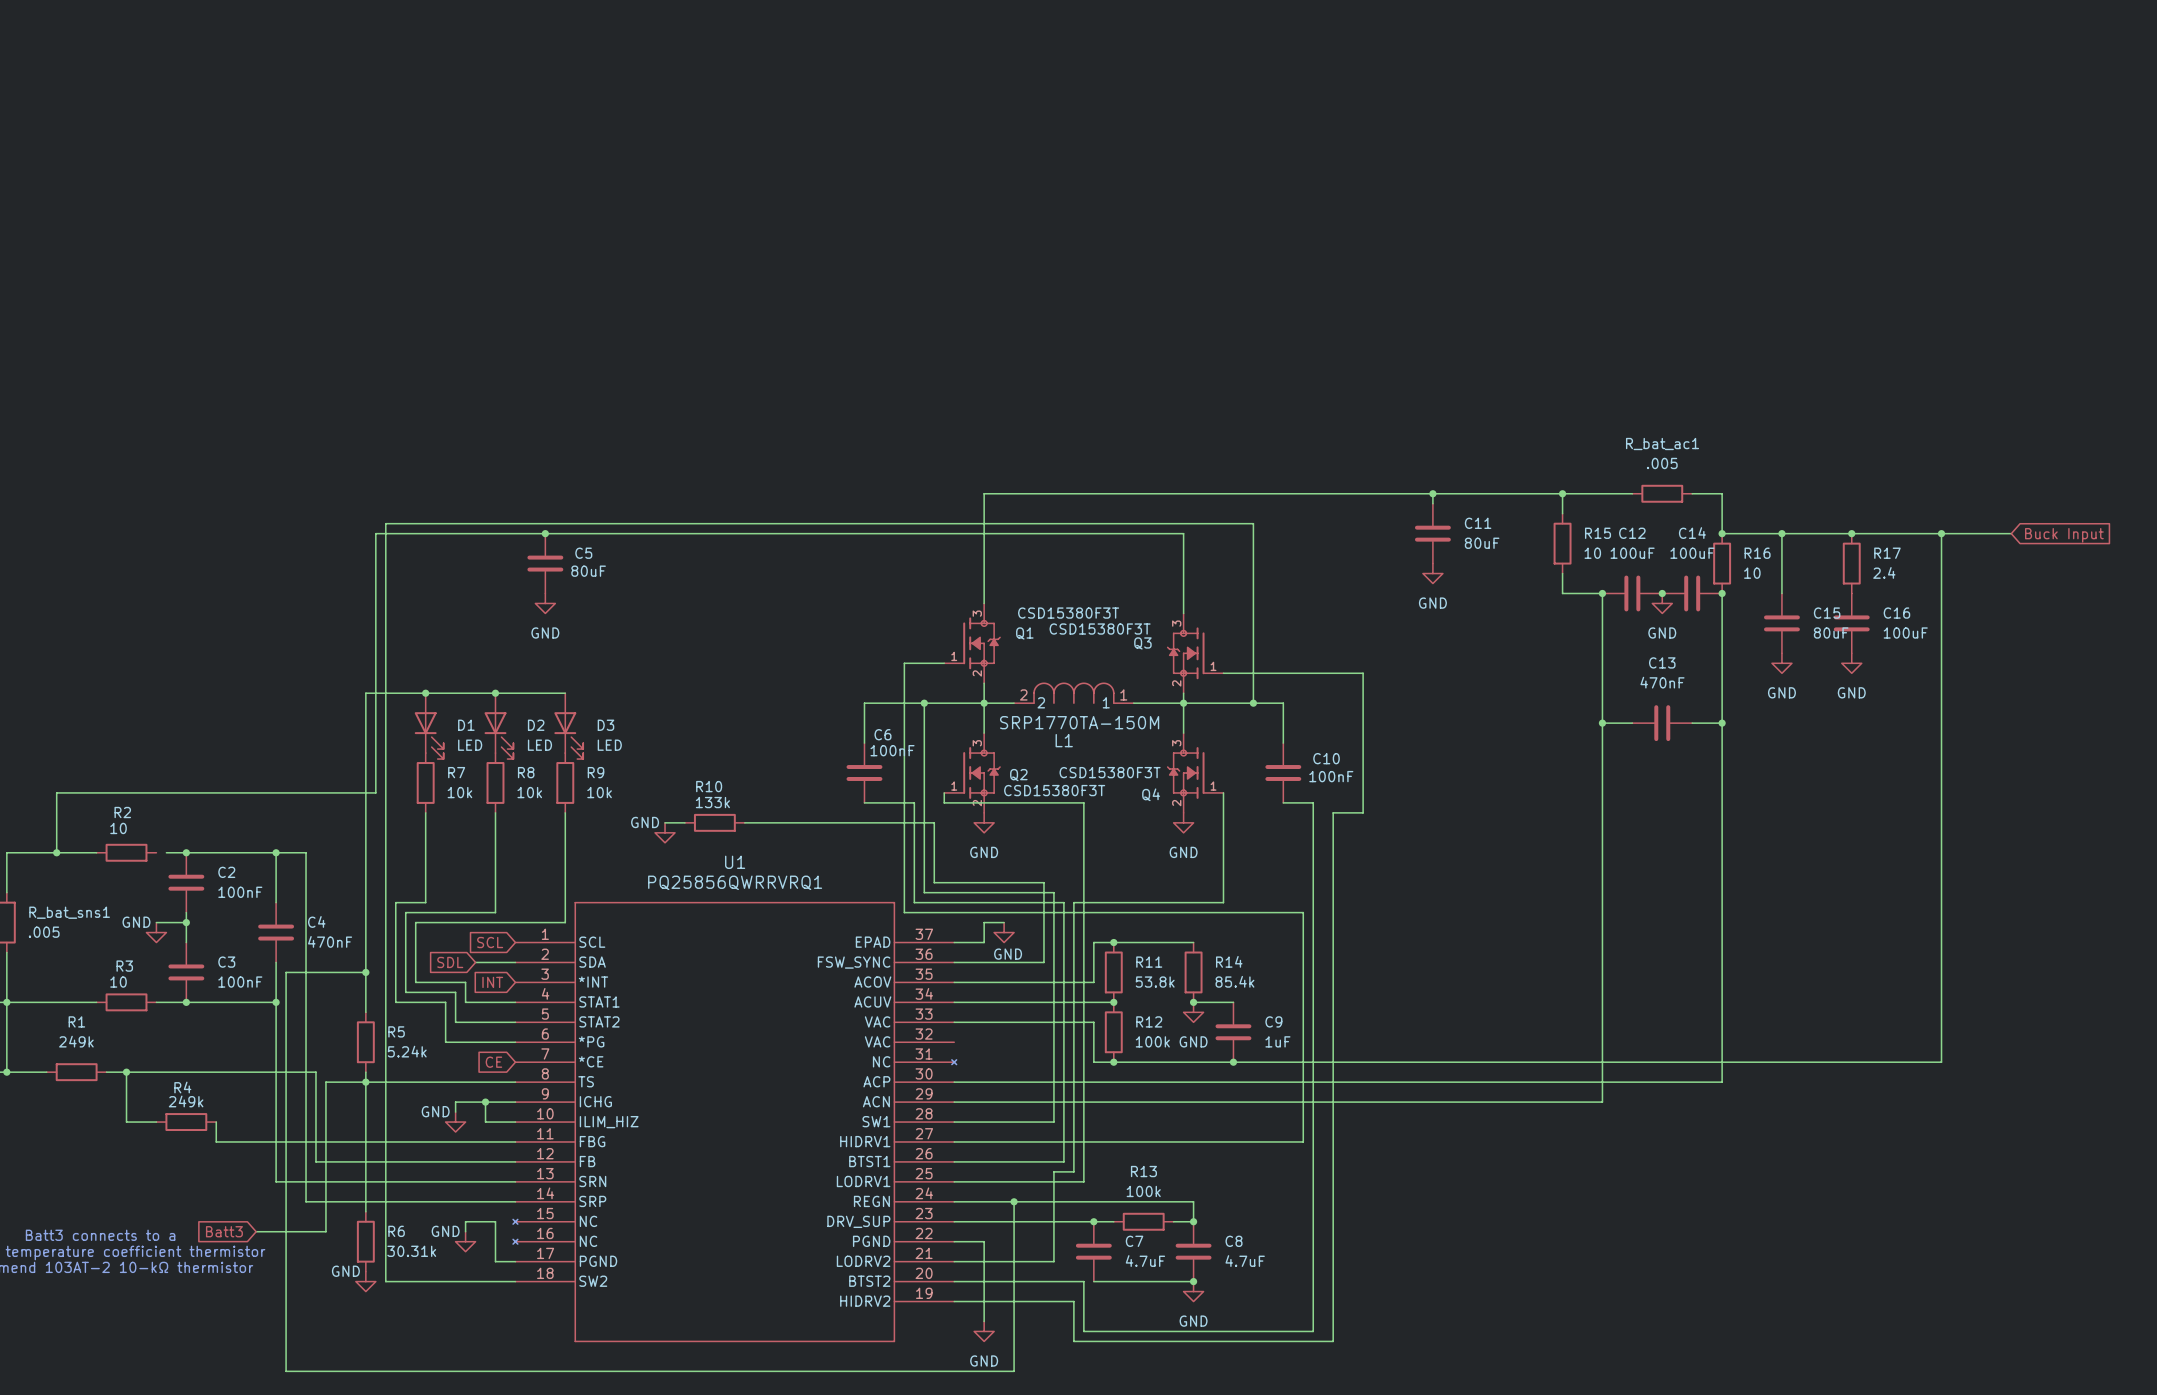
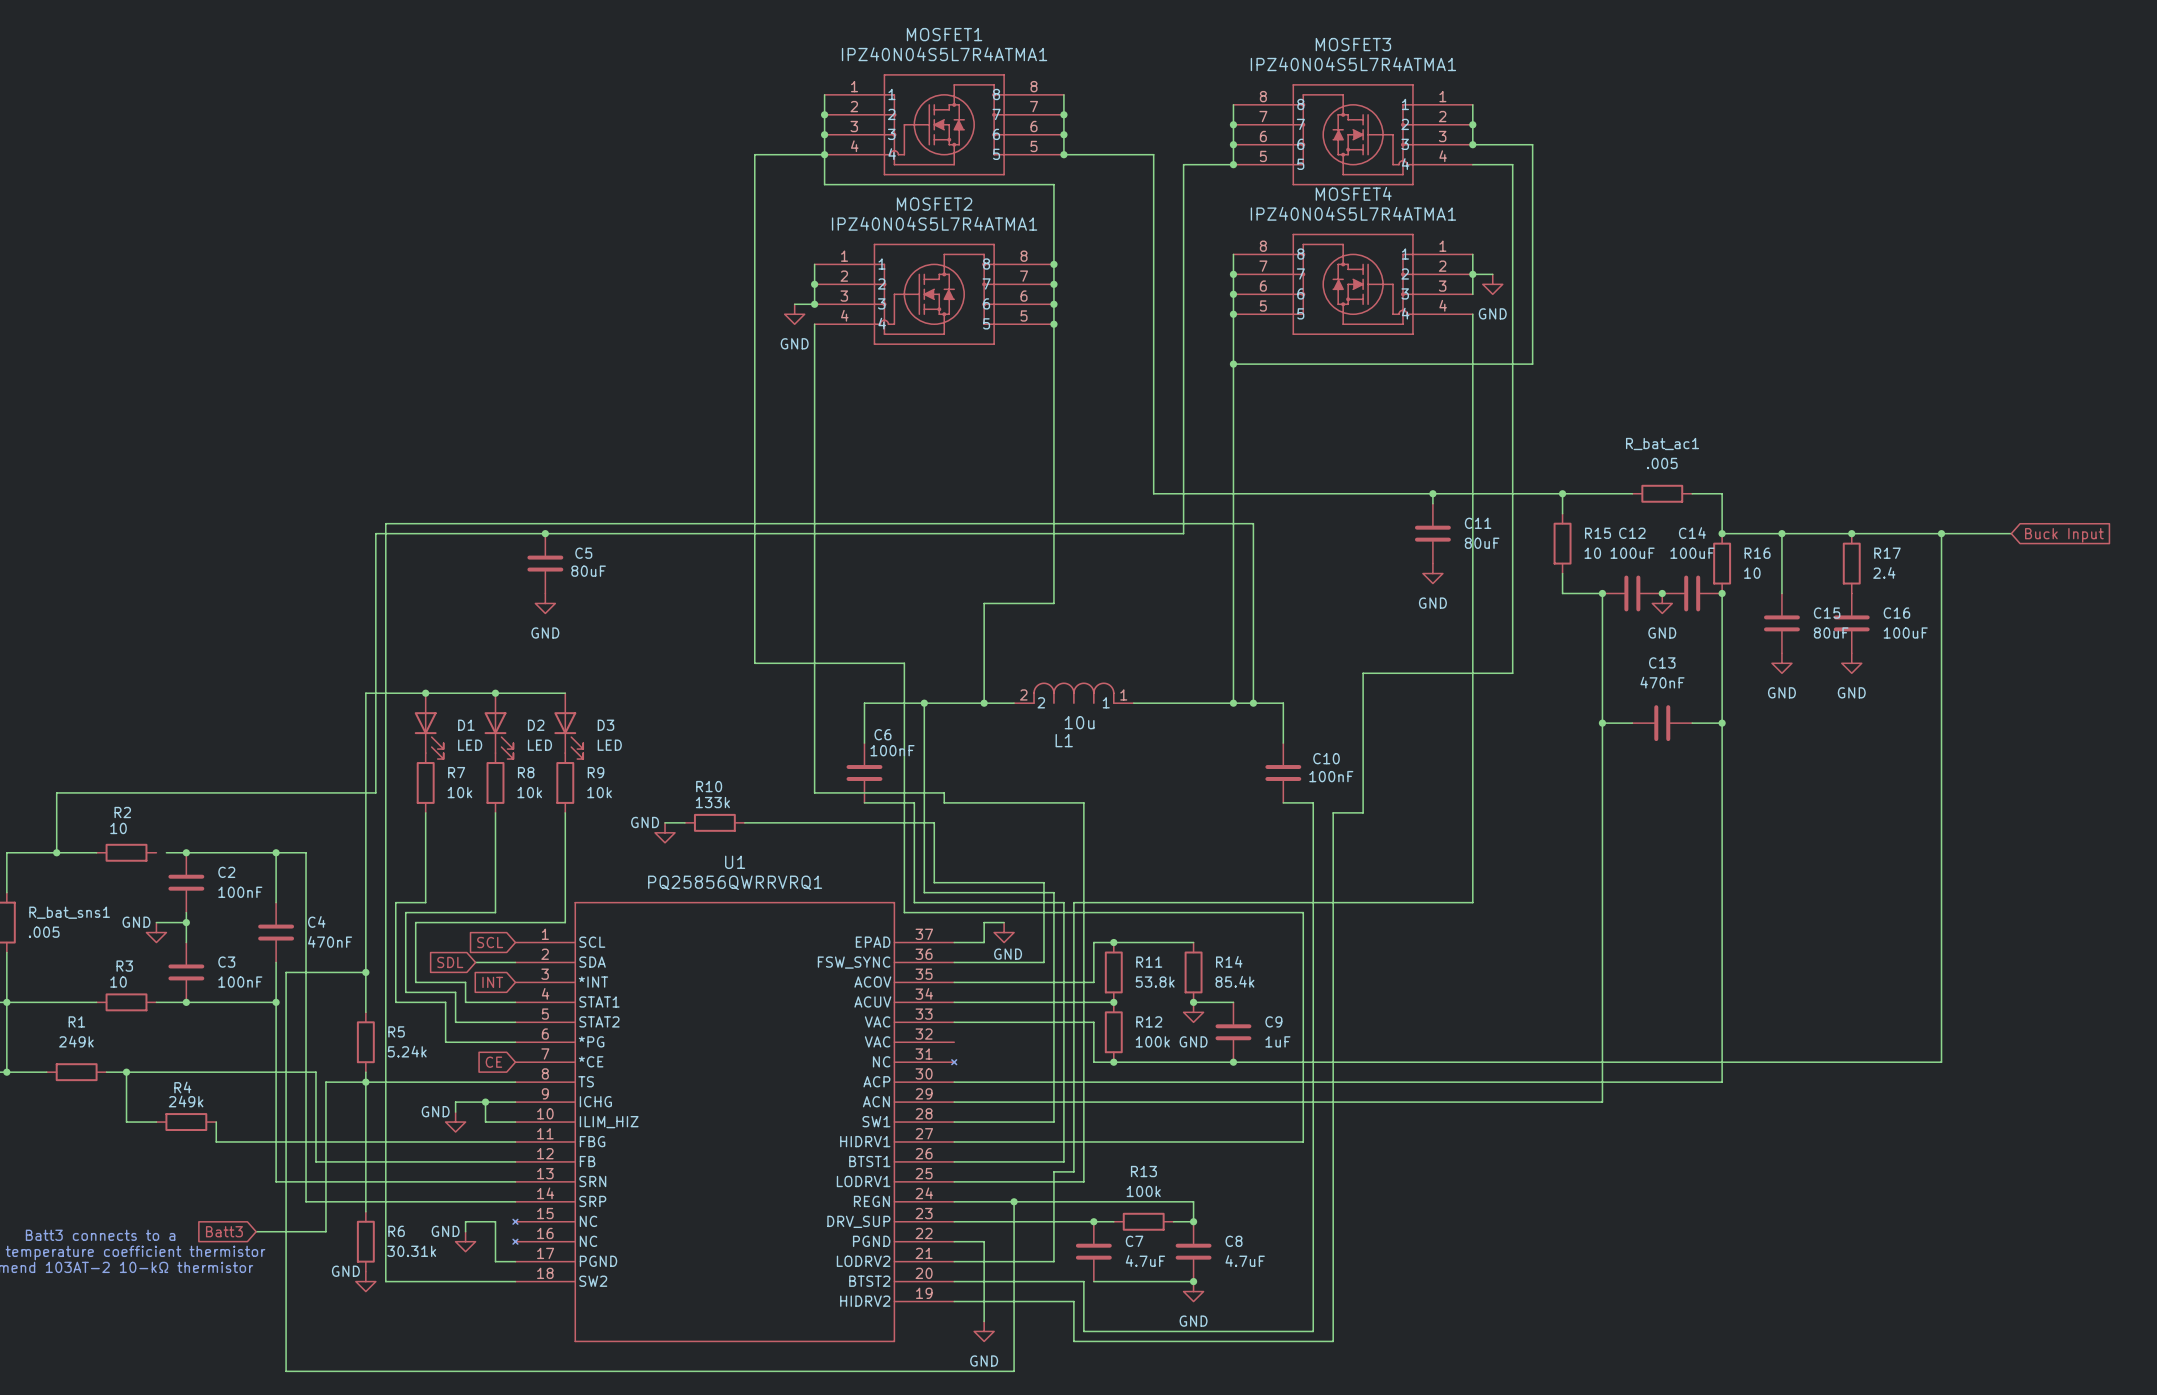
wire: none -> (824, 94) (824, 184) (1053, 184) (1053, 603) (984, 603) (984, 683)
wire: none -> (1472, 104) (1472, 144) (1532, 144) (1532, 364) (1233, 364)
junction: none -> (824, 114)
junction: none -> (1063, 114)
MOSFET1: none -> IPZ40N04S5L7R4ATMA1 (944, 124)
junction: none -> (1233, 124)
junction: none -> (1472, 124)
junction: none -> (824, 134)
junction: none -> (1063, 134)
MOSFET3: none -> IPZ40N04S5L7R4ATMA1 (1353, 134)
junction: none -> (1233, 144)
junction: none -> (1472, 144)
junction: none -> (824, 154)
junction: none -> (1063, 154)
junction: none -> (1233, 164)
wire: none -> (1233, 254) (1233, 703)
wire: none -> (1472, 254) (1472, 294)
wire: none -> (814, 264) (814, 304) (794, 304)
junction: none -> (1053, 264)
junction: none -> (1233, 274)
wire: none -> (1472, 274) (1492, 274)
junction: none -> (1472, 274)
junction: none -> (814, 284)
junction: none -> (1053, 284)
MOSFET4: none -> IPZ40N04S5L7R4ATMA1 (1353, 284)
power symbol: none -> GND (1492, 284)
MOSFET2: none -> IPZ40N04S5L7R4ATMA1 (934, 294)
junction: none -> (1233, 294)
junction: none -> (814, 304)
junction: none -> (1053, 304)
power symbol: none -> GND (794, 314)
junction: none -> (1233, 314)
wire: none -> (814, 324) (814, 792) (944, 792)
junction: none -> (1053, 324)
junction: none -> (1233, 364)
wire: (1153, 493) (984, 493) (984, 603) -> (1153, 493) (1153, 154) (1063, 154) (1063, 94)
wire: (1183, 533) (1183, 613) -> (1183, 533) (1183, 164) (1233, 164) (1233, 104)
Q1: CSD15380F3T (972, 643) -> none
Q3: CSD15380F3T (1195, 653) -> none
wire: (904, 663) (944, 663) -> (904, 663) (754, 663) (754, 154) (824, 154)
wire: (1223, 673) (1363, 673) -> (1472, 164) (1512, 164) (1512, 673) (1363, 673)
wire: (1183, 693) (1183, 733) -> none
wire: (984, 703) (984, 733) -> none
junction: (1183, 703) -> none
junction: none -> (1233, 703)
L1 value: SRP1770TA-150M (1079, 722) -> 10u (1079, 722)
Q2: CSD15380F3T (972, 772) -> none
Q4: CSD15380F3T (1195, 772) -> none
wire: (1223, 792) (1223, 902) -> (1472, 314) (1472, 902) (1223, 902)
power symbol: GND (984, 822) -> none
power symbol: GND (1183, 822) -> none

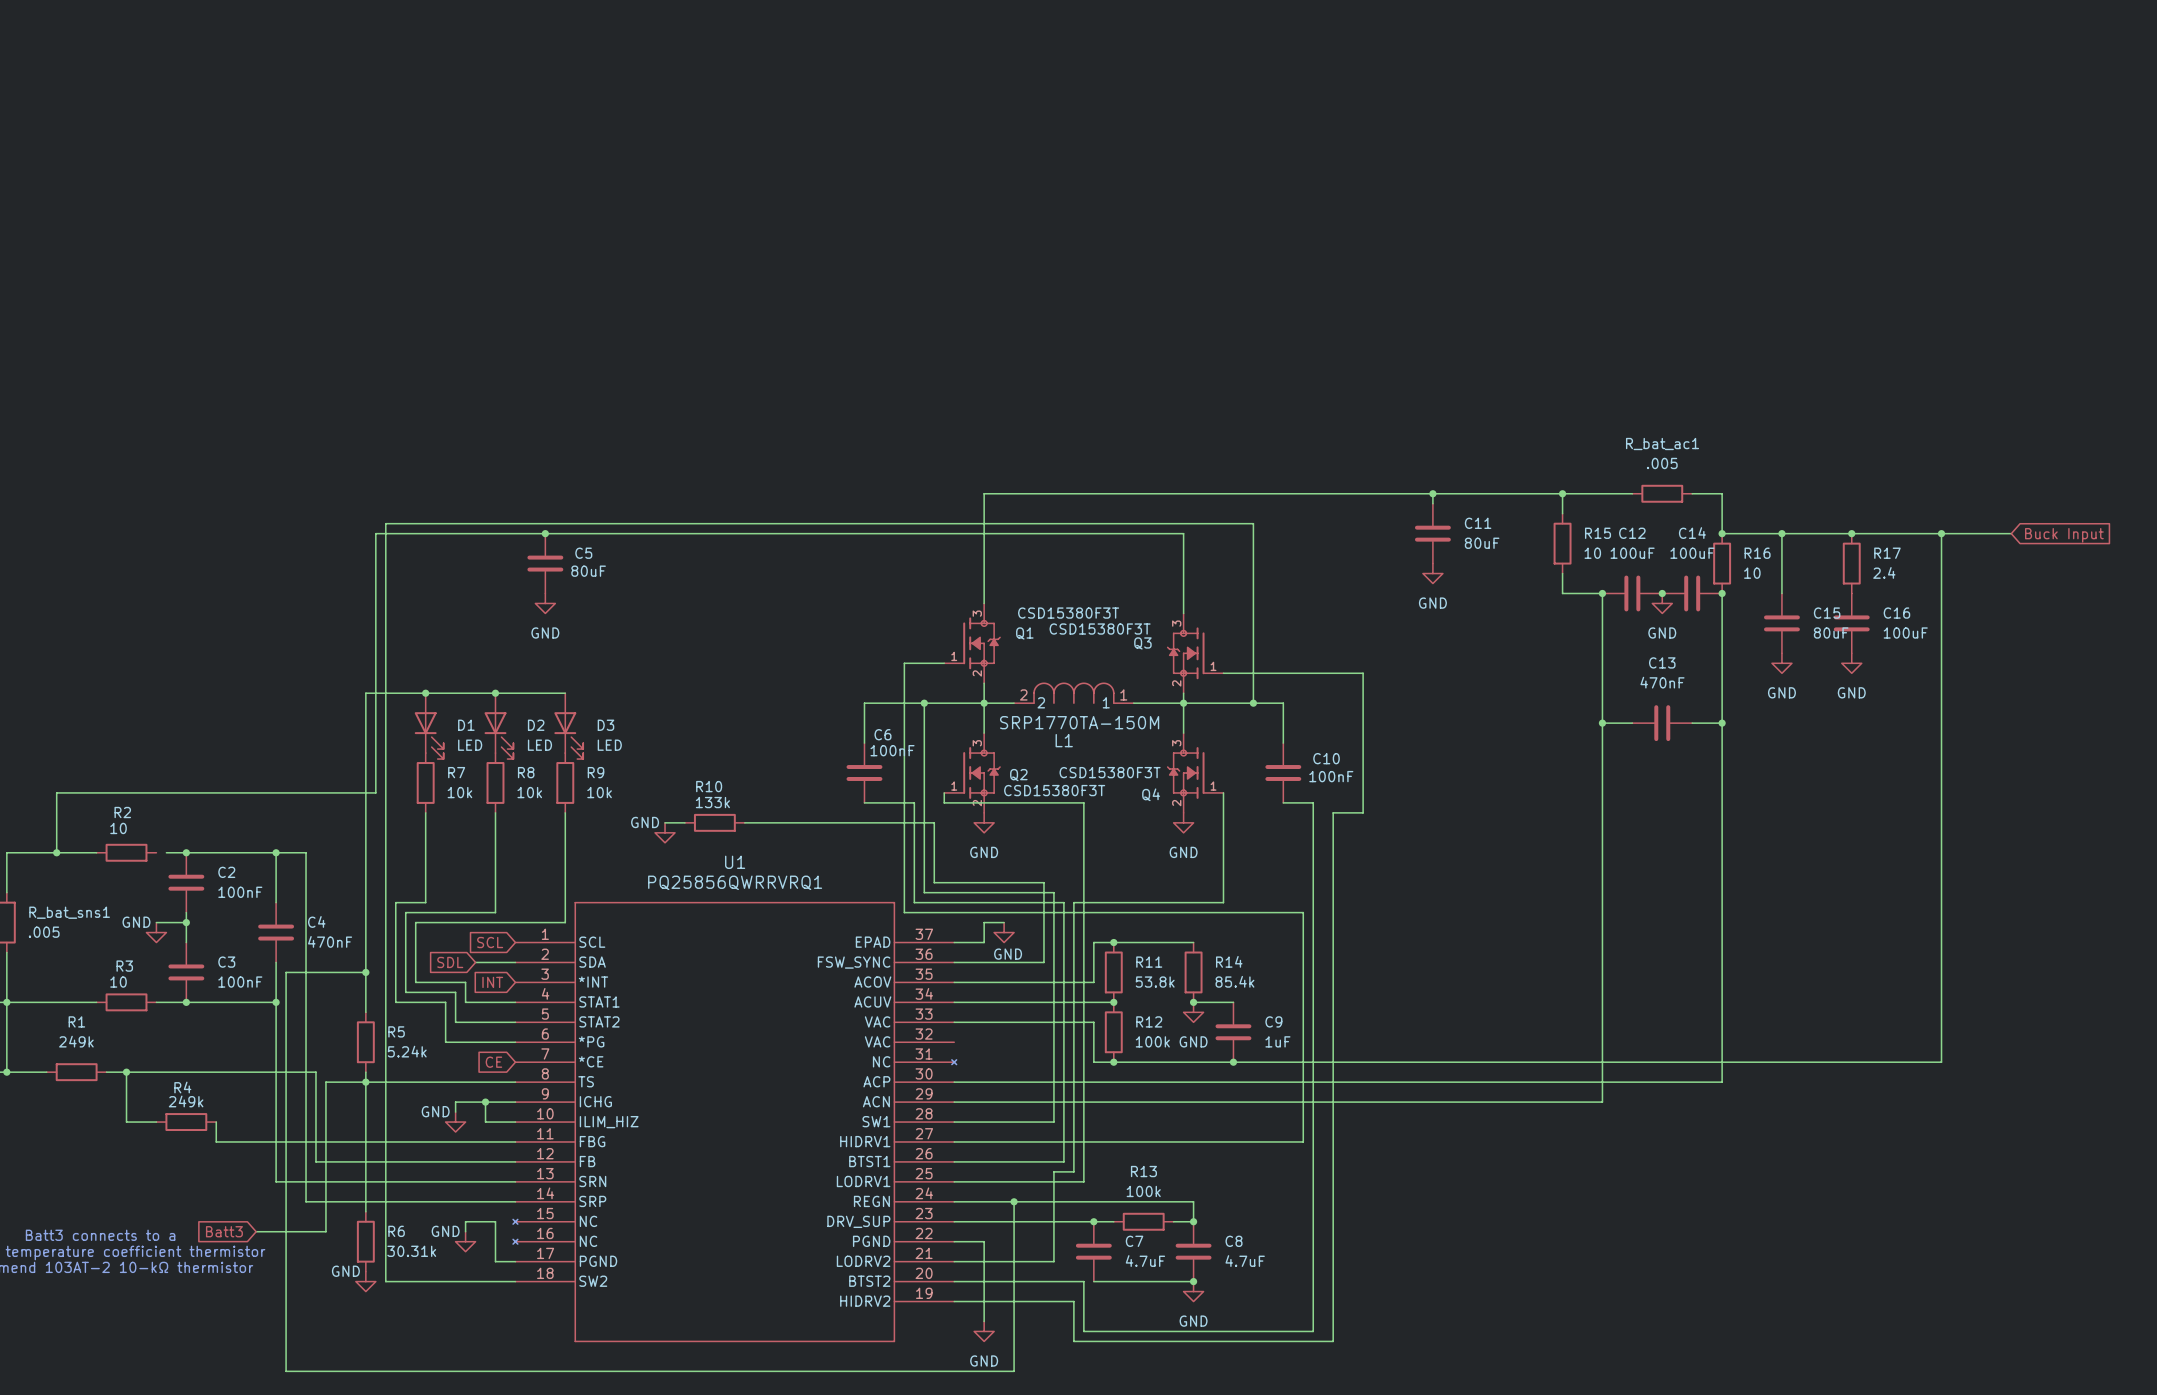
wire: (824, 94) (824, 184) (1053, 184) (1053, 603) (984, 603) (984, 683) -> none
wire: (1063, 94) (1063, 154) (1153, 154) (1153, 493) -> (984, 603) (984, 493) (1153, 493)
wire: (1233, 104) (1233, 164) (1183, 164) (1183, 533) -> (1183, 613) (1183, 533)
wire: (1472, 104) (1472, 144) (1532, 144) (1532, 364) (1233, 364) -> none
junction: (824, 114) -> none
junction: (1063, 114) -> none
MOSFET1: IPZ40N04S5L7R4ATMA1 (944, 124) -> none
junction: (1233, 124) -> none
junction: (1472, 124) -> none
junction: (824, 134) -> none
junction: (1063, 134) -> none
MOSFET3: IPZ40N04S5L7R4ATMA1 (1353, 134) -> none
junction: (1233, 144) -> none
junction: (1472, 144) -> none
wire: (824, 154) (754, 154) (754, 663) (904, 663) -> (944, 663) (904, 663)
junction: (824, 154) -> none
junction: (1063, 154) -> none
junction: (1233, 164) -> none
wire: (1472, 164) (1512, 164) (1512, 673) (1363, 673) -> (1223, 673) (1363, 673)
wire: (1233, 254) (1233, 703) -> none
wire: (1472, 254) (1472, 294) -> none
wire: (814, 264) (814, 304) (794, 304) -> none
junction: (1053, 264) -> none
junction: (1233, 274) -> none
wire: (1472, 274) (1492, 274) -> none
junction: (1472, 274) -> none
junction: (814, 284) -> none
junction: (1053, 284) -> none
MOSFET4: IPZ40N04S5L7R4ATMA1 (1353, 284) -> none
power symbol: GND (1492, 284) -> none
MOSFET2: IPZ40N04S5L7R4ATMA1 (934, 294) -> none
junction: (1233, 294) -> none
junction: (814, 304) -> none
junction: (1053, 304) -> none
power symbol: GND (794, 314) -> none
junction: (1233, 314) -> none
wire: (1472, 314) (1472, 902) (1223, 902) -> (1223, 792) (1223, 902)
wire: (814, 324) (814, 792) (944, 792) -> none
junction: (1053, 324) -> none
junction: (1233, 364) -> none
Q1: none -> CSD15380F3T (972, 643)
Q3: none -> CSD15380F3T (1195, 653)
wire: none -> (1183, 693) (1183, 733)
wire: none -> (984, 703) (984, 733)
junction: none -> (1183, 703)
junction: (1233, 703) -> none
L1 value: 10u (1079, 722) -> SRP1770TA-150M (1079, 722)
Q2: none -> CSD15380F3T (972, 772)
Q4: none -> CSD15380F3T (1195, 772)
power symbol: none -> GND (984, 822)
power symbol: none -> GND (1183, 822)

